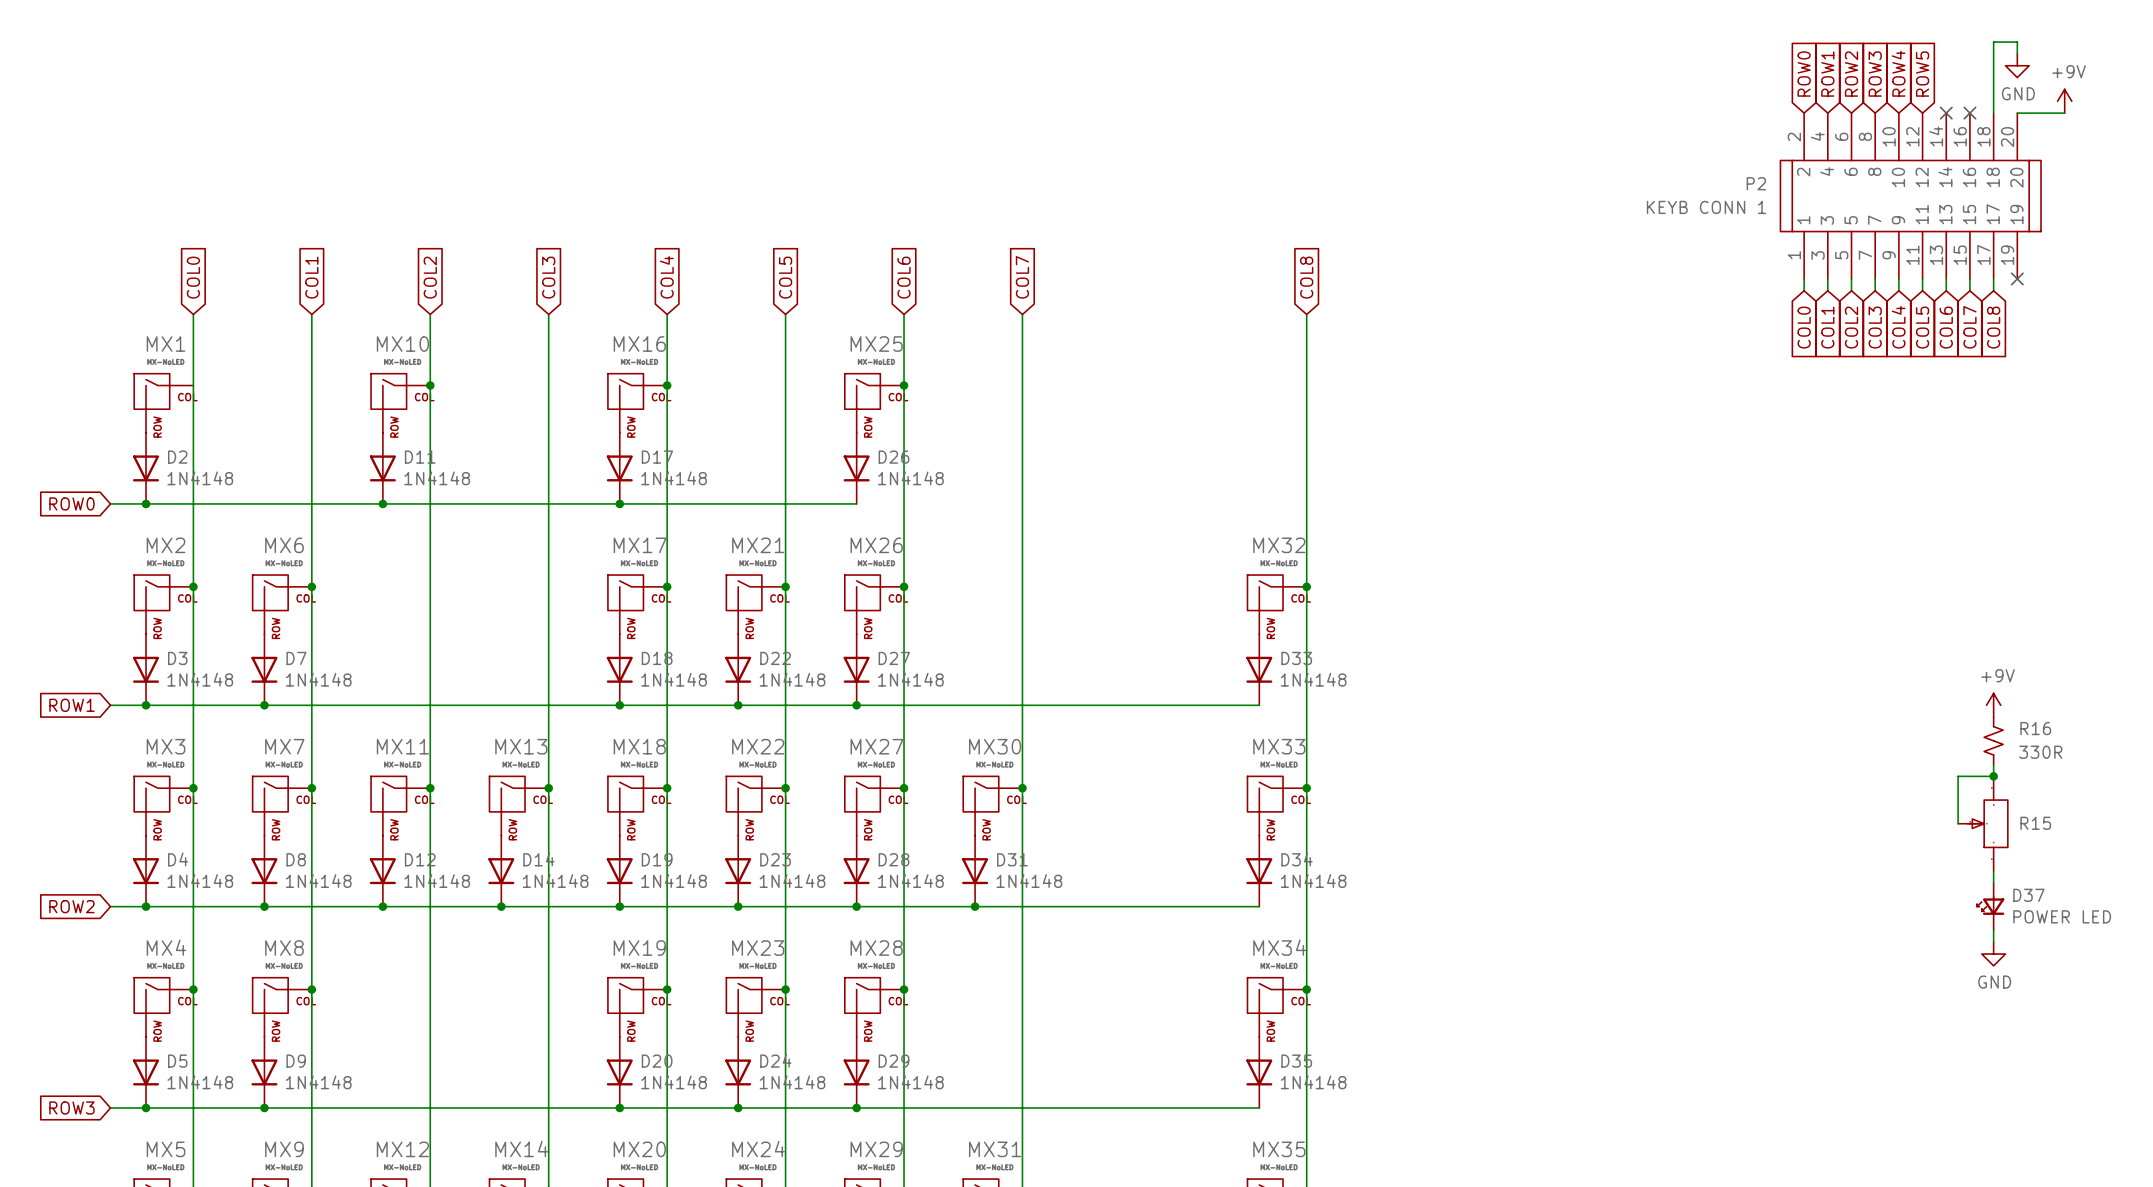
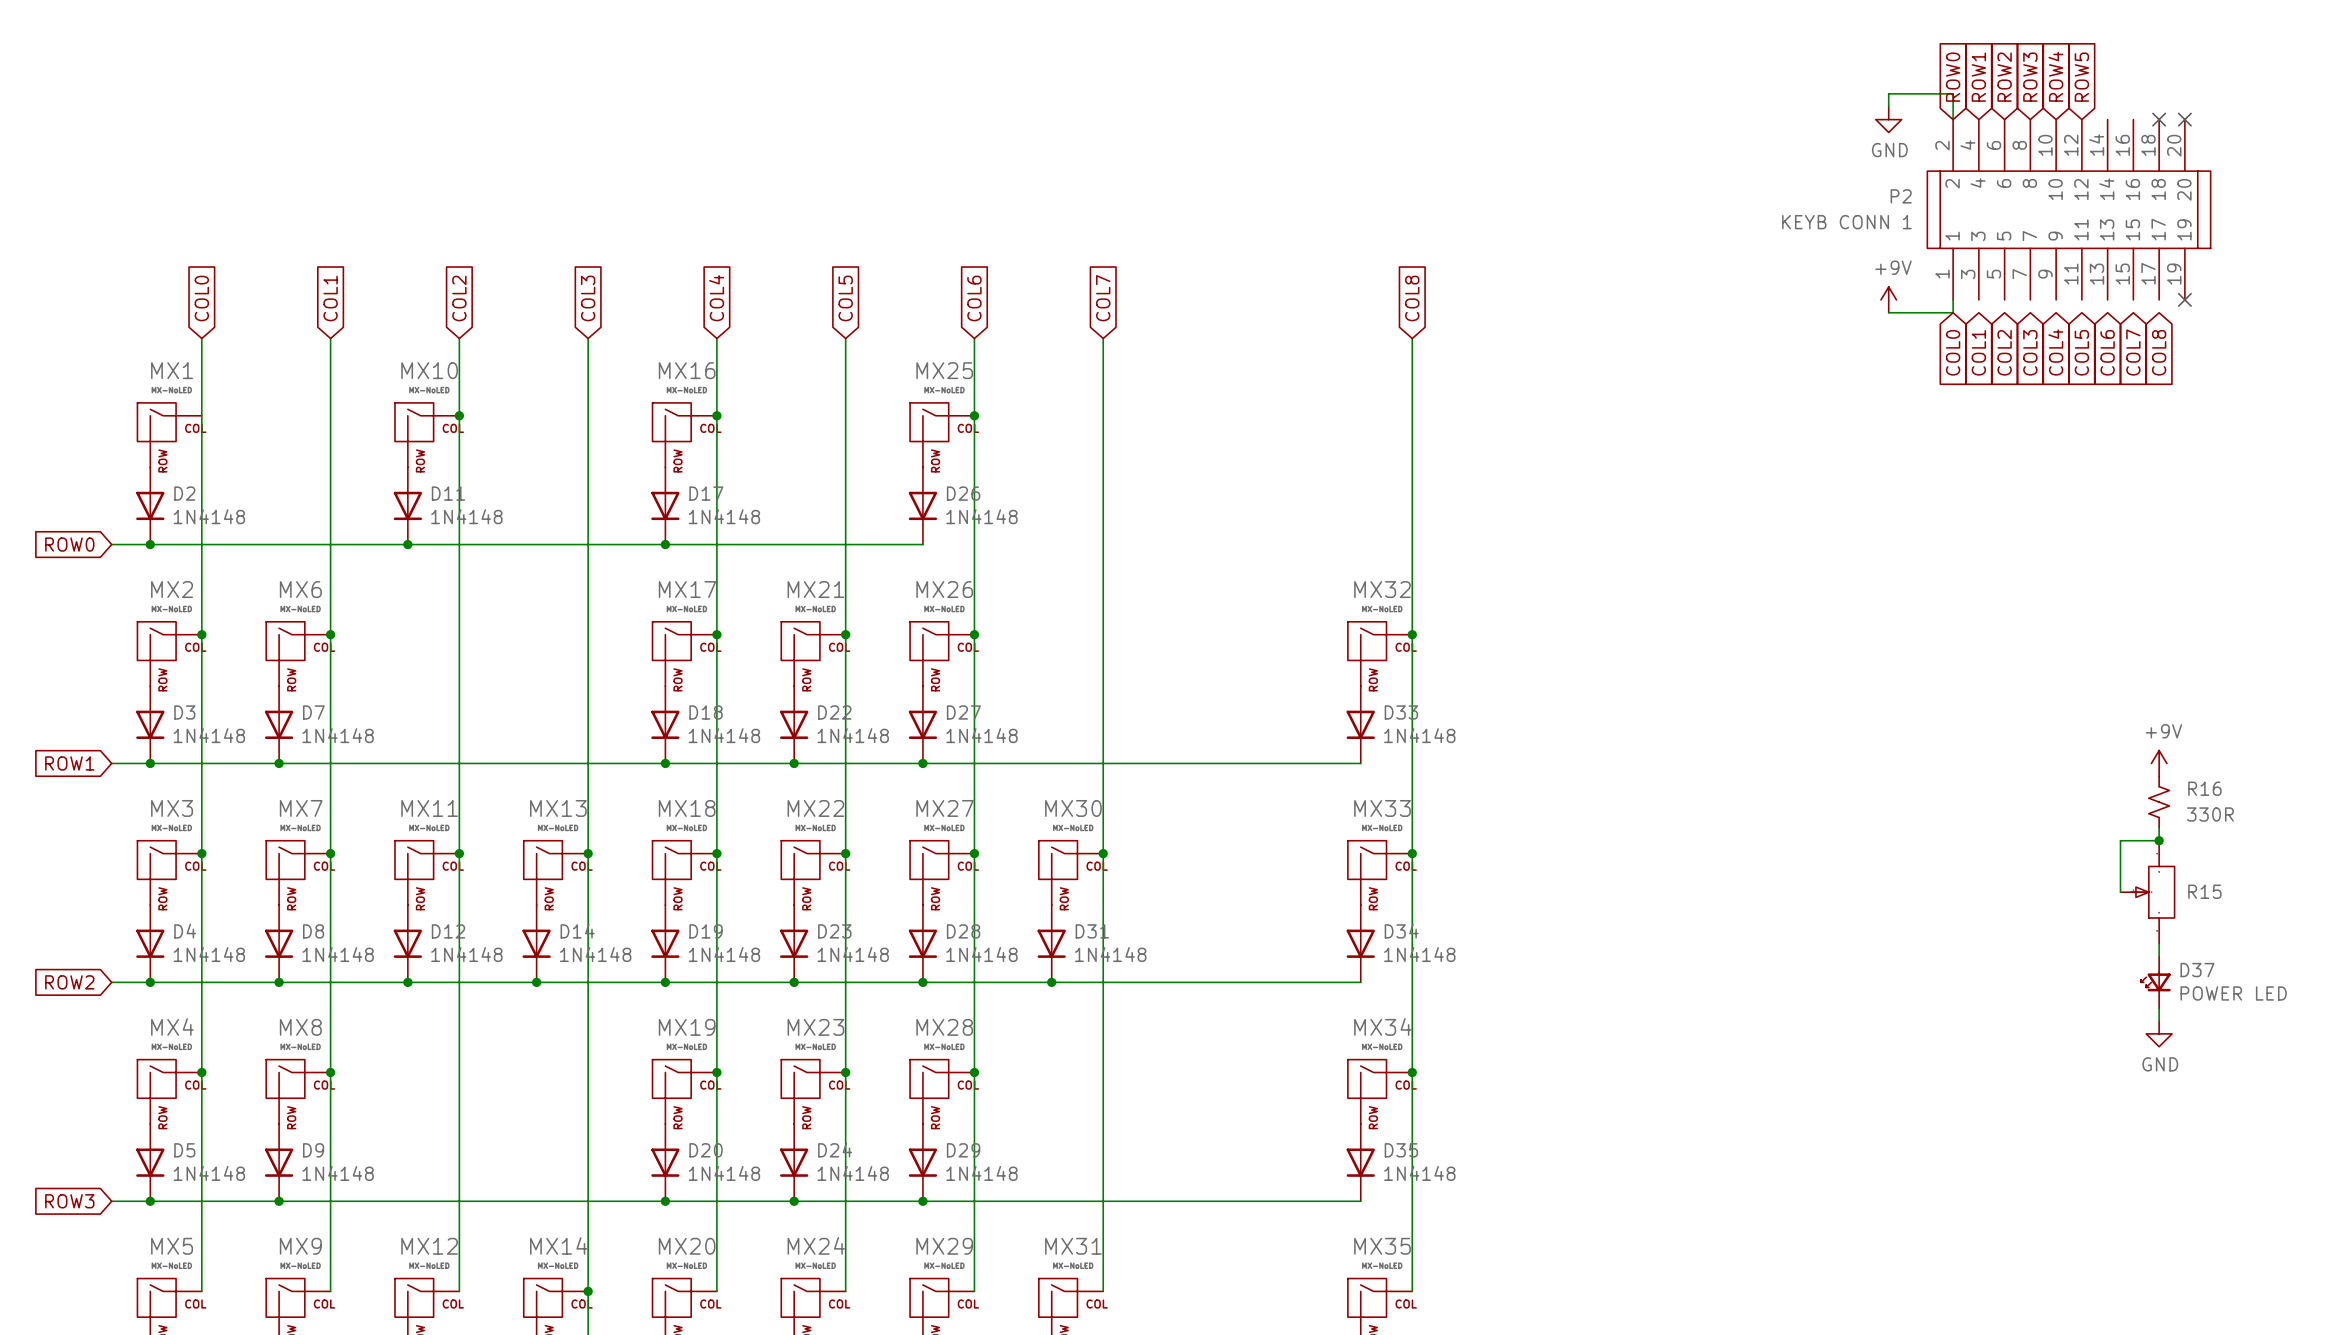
wire: (2017, 53) (2017, 42) (1993, 42) (1993, 113) -> none
power symbol: GND (2017, 65) -> none
wire: none -> (1888, 106) (1888, 93) (1953, 93) (1953, 119)
power symbol: +9V (2064, 101) -> none
power symbol: none -> GND (1888, 119)
no-connect mark: (1946, 113) -> none
no-connect mark: (1969, 113) -> none
no-connect mark: none -> (2159, 119)
wire: (2017, 113) (2064, 113) -> none
no-connect mark: none -> (2184, 119)
power symbol: none -> +9V (1888, 299)
wire: (1827, 278) (1827, 290) -> none
wire: (1851, 278) (1851, 290) -> none
wire: (1875, 278) (1875, 290) -> none
wire: (1898, 278) (1898, 290) -> none
wire: (1922, 278) (1922, 290) -> none
wire: (1946, 278) (1946, 290) -> none
wire: (1969, 278) (1969, 290) -> none
wire: (1993, 278) (1993, 290) -> none
wire: none -> (1888, 312) (1953, 312)

